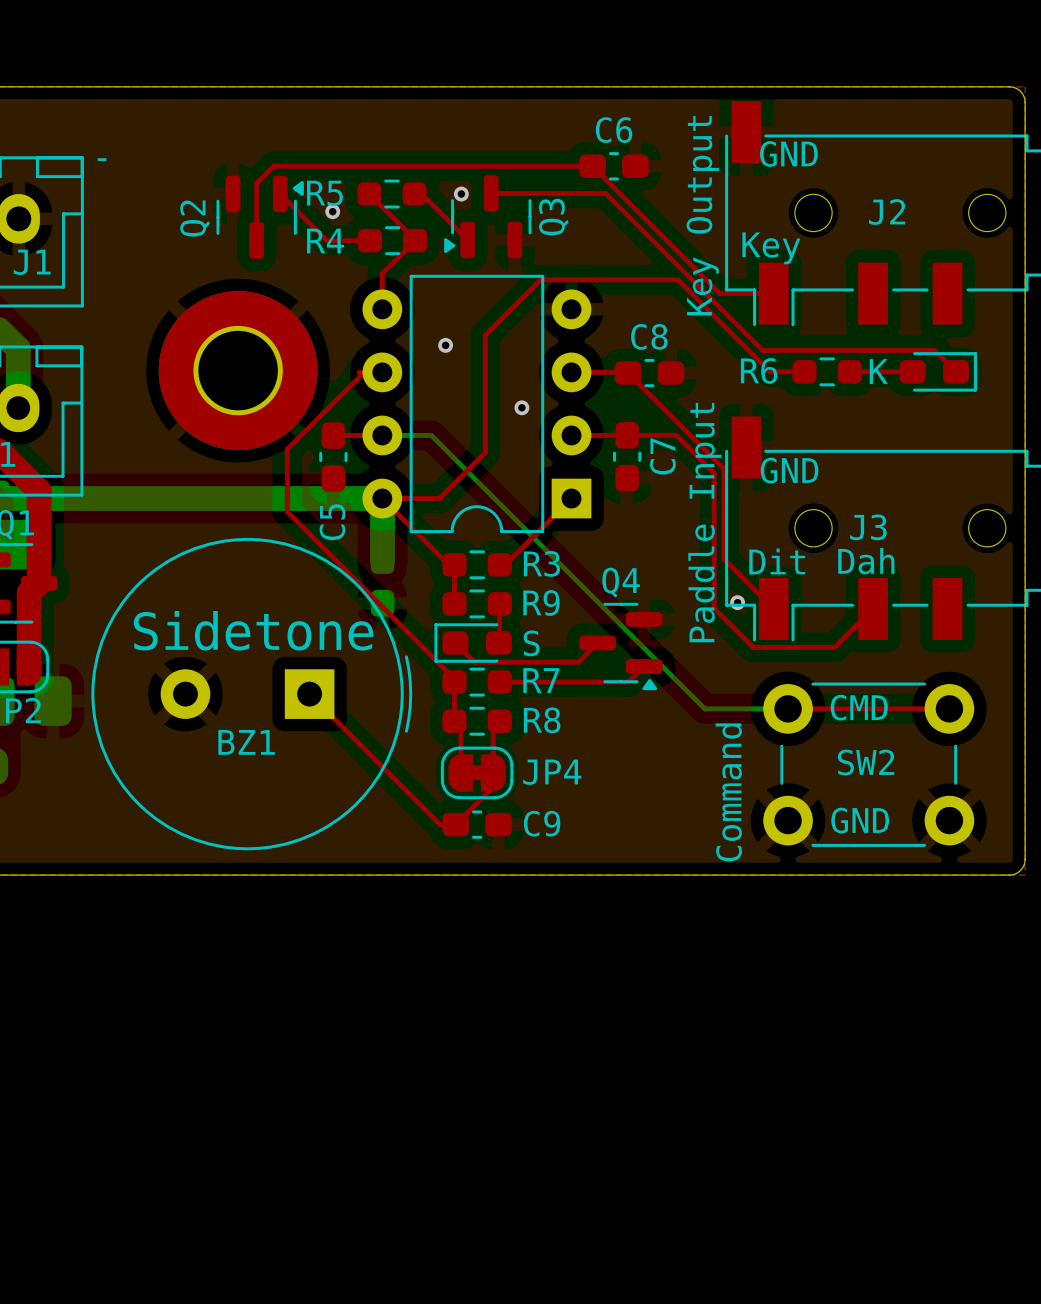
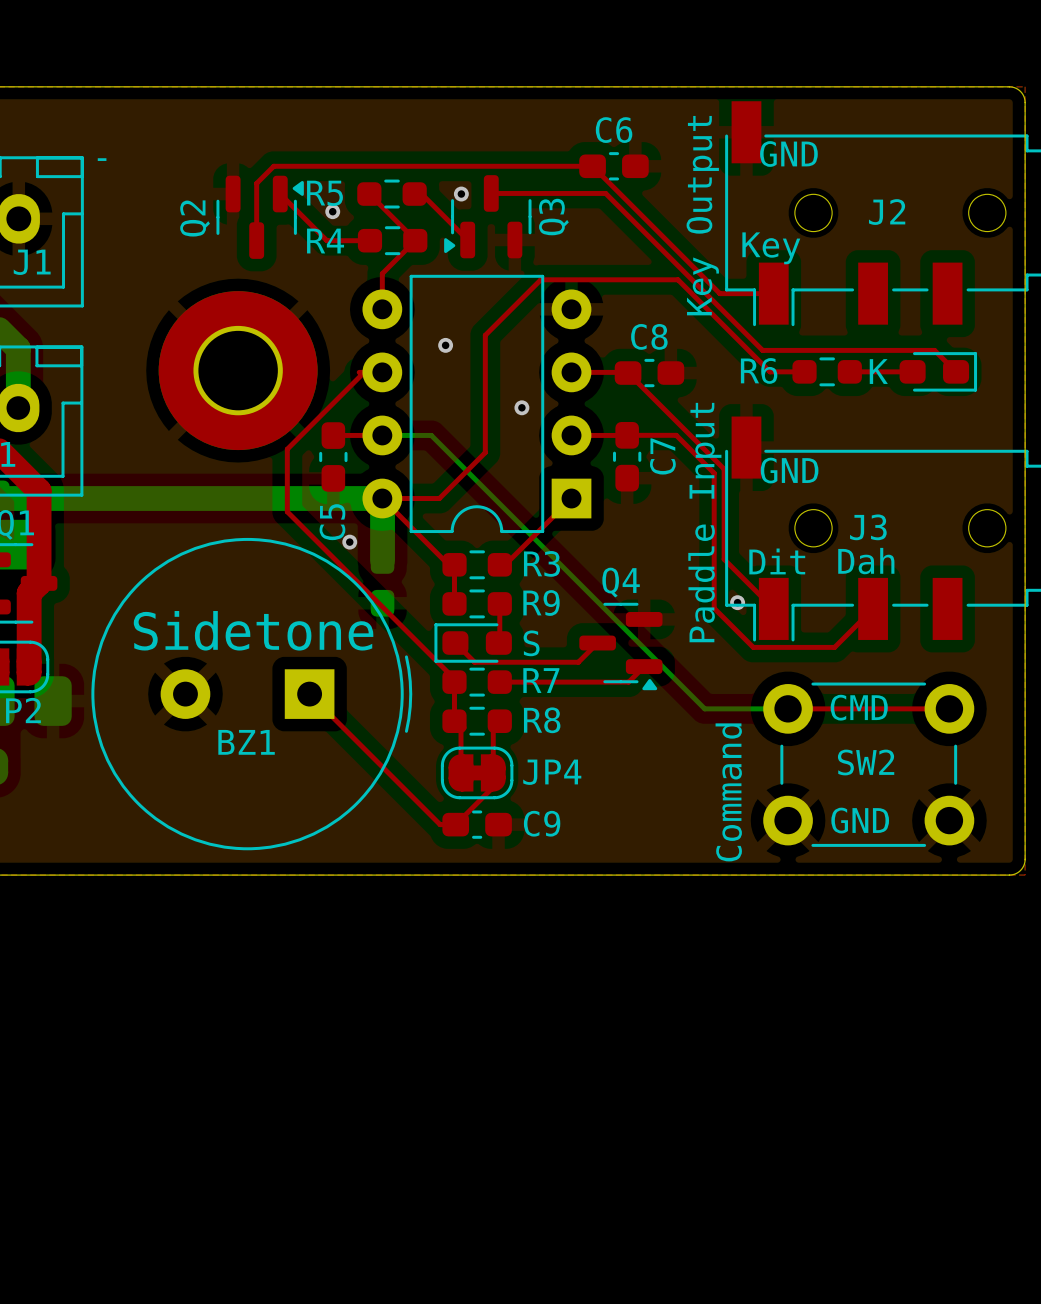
via: none -> (349, 542)

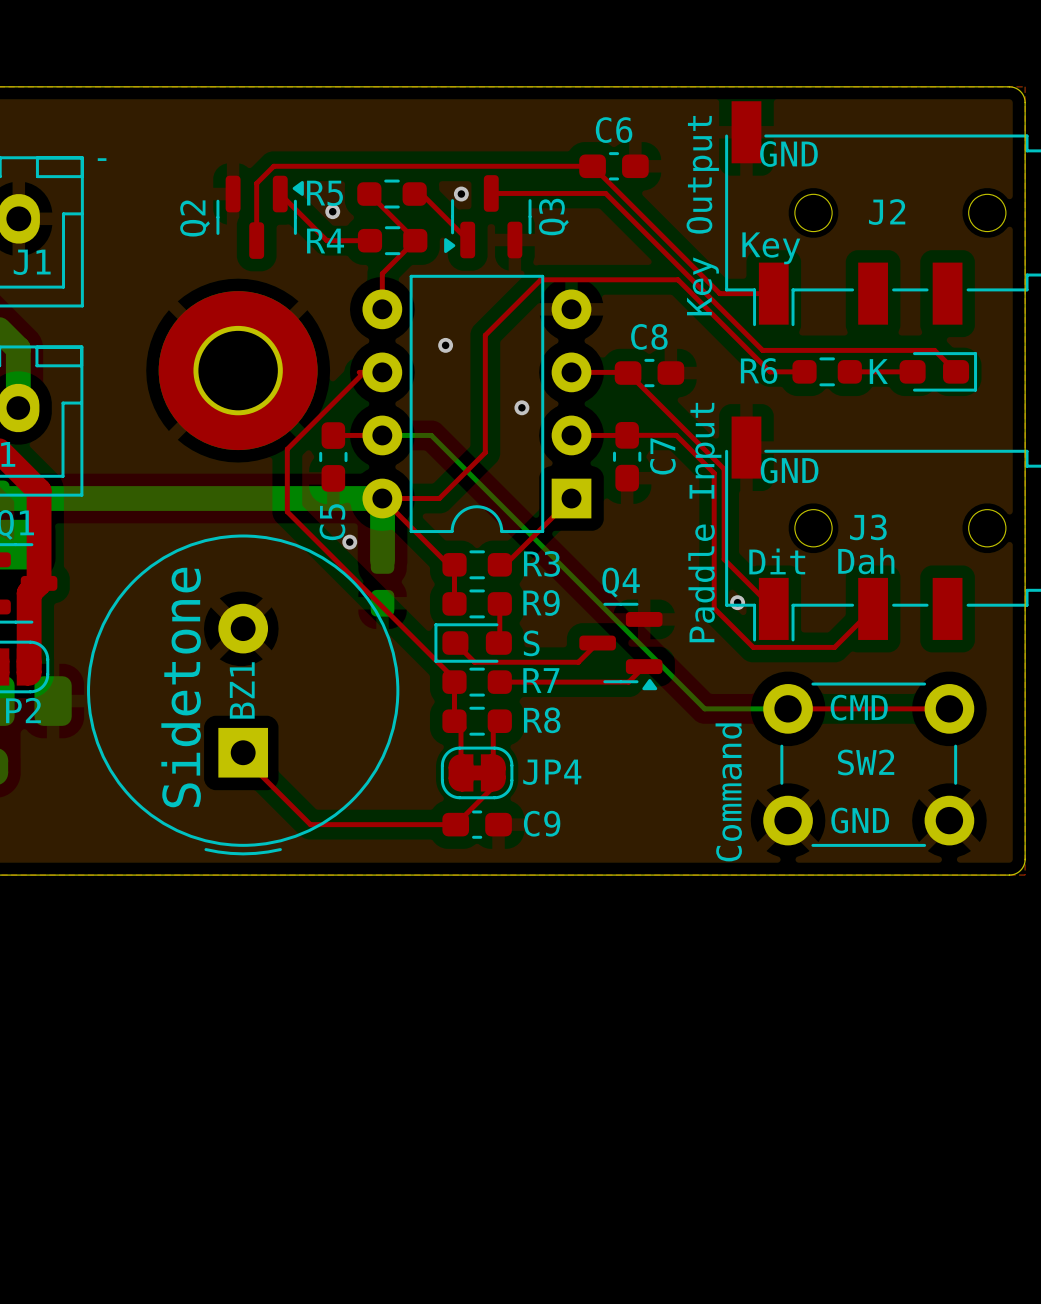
text rotation: 0° (253, 630) -> 90° counterclockwise (181, 687)
BZ1 rotation: 0° (251, 694) -> 90° clockwise (243, 694)
top track: (309, 694) (440, 824) -> (241, 755) (310, 824) (440, 824)
BZ1 name position: BZ1 (246, 742) -> BZ1 (242, 690)

